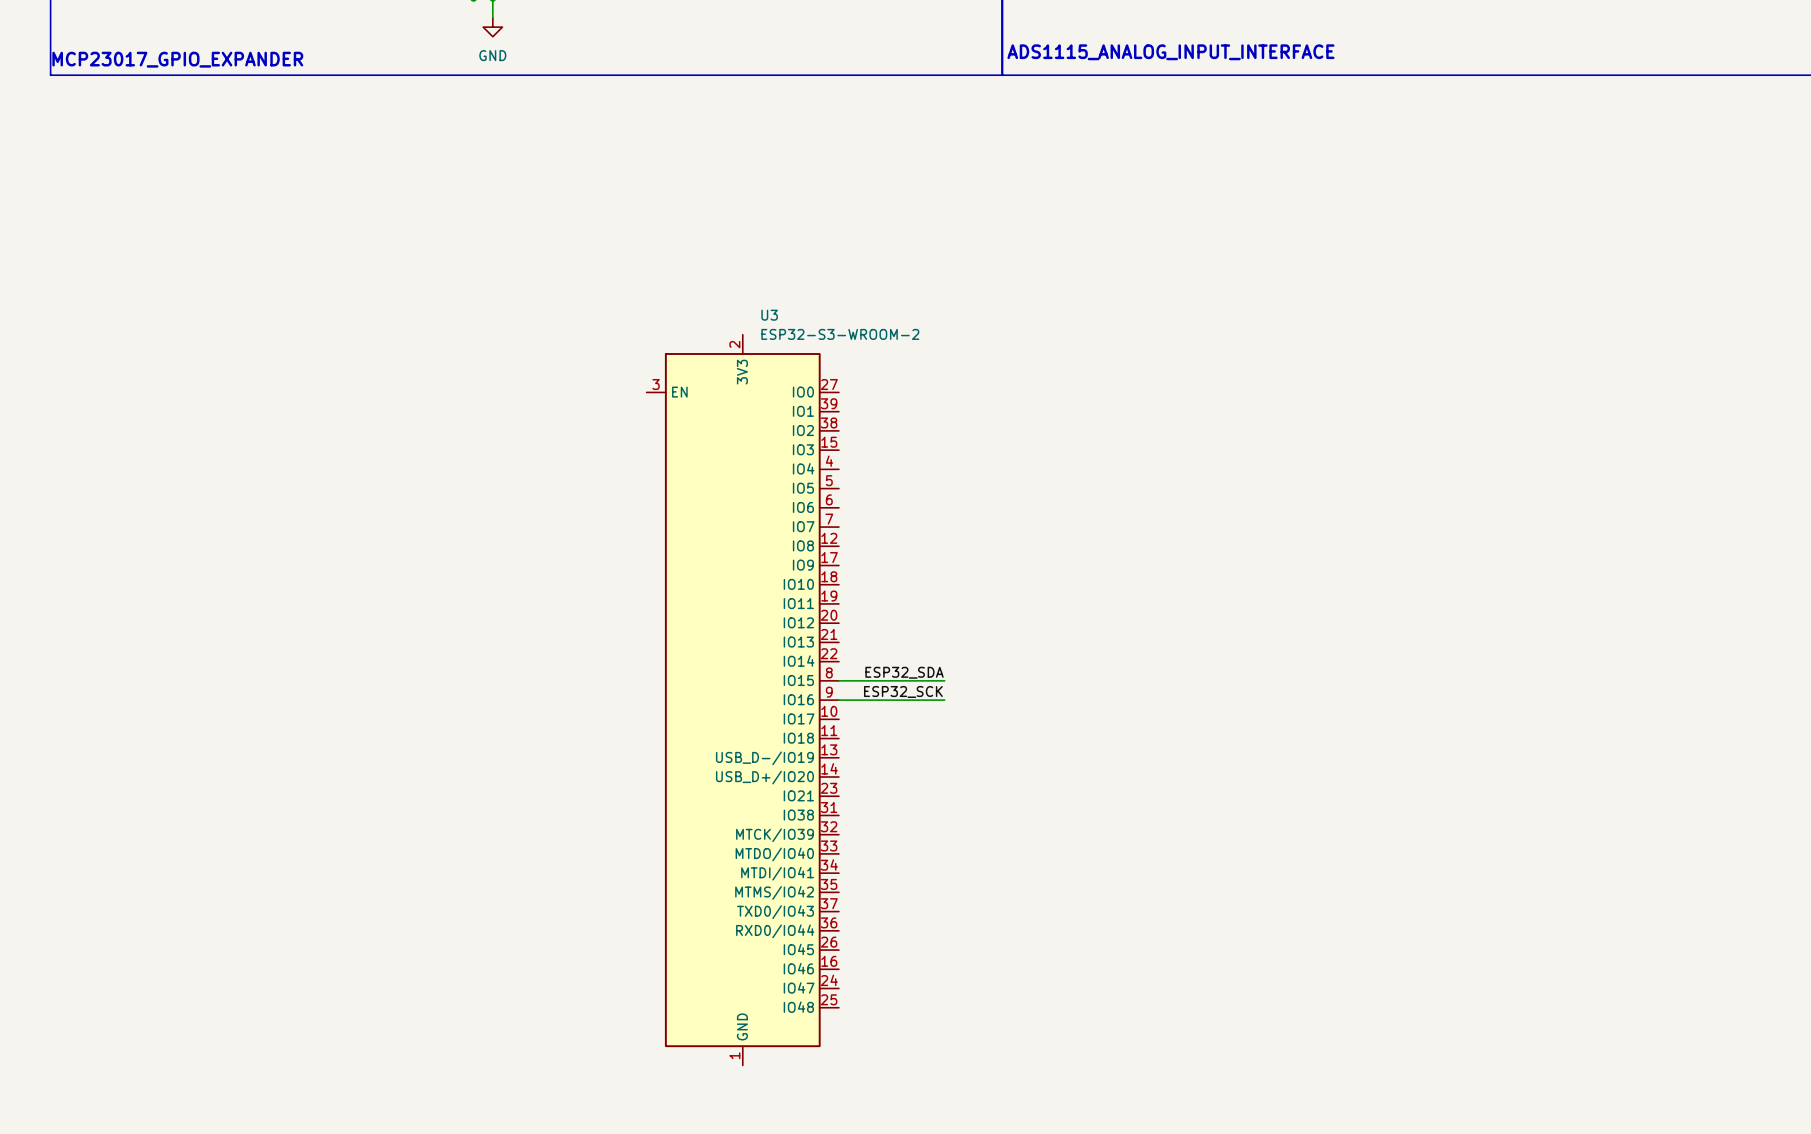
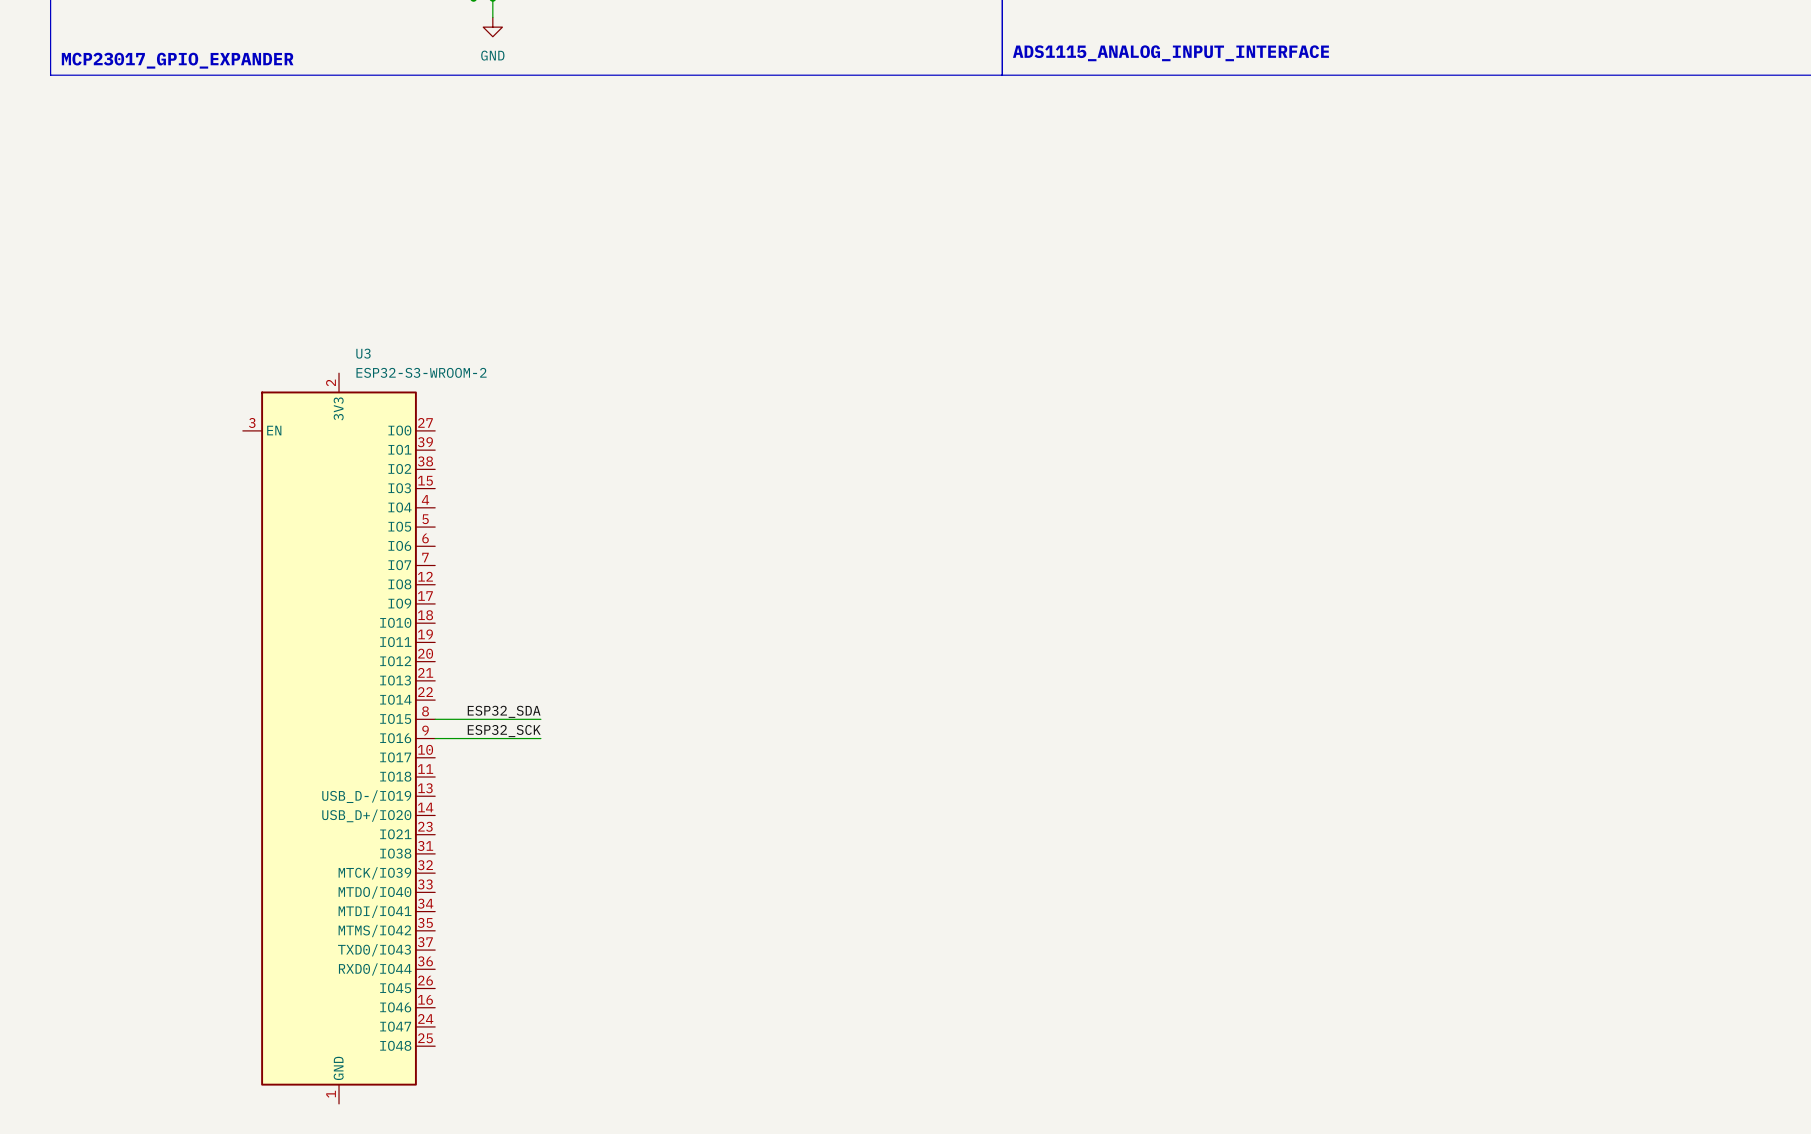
label: ESP32_SDA (904, 672) -> none
wire: (838, 680) (944, 680) -> none
label: ESP32_SCK (903, 691) -> none
U3 position: (742, 700) -> (339, 738)
wire: (838, 700) (944, 700) -> none
label: none -> ESP32_SDA (504, 711)
wire: none -> (435, 719) (540, 719)
label: none -> ESP32_SCK (504, 731)
wire: none -> (435, 738) (540, 738)

